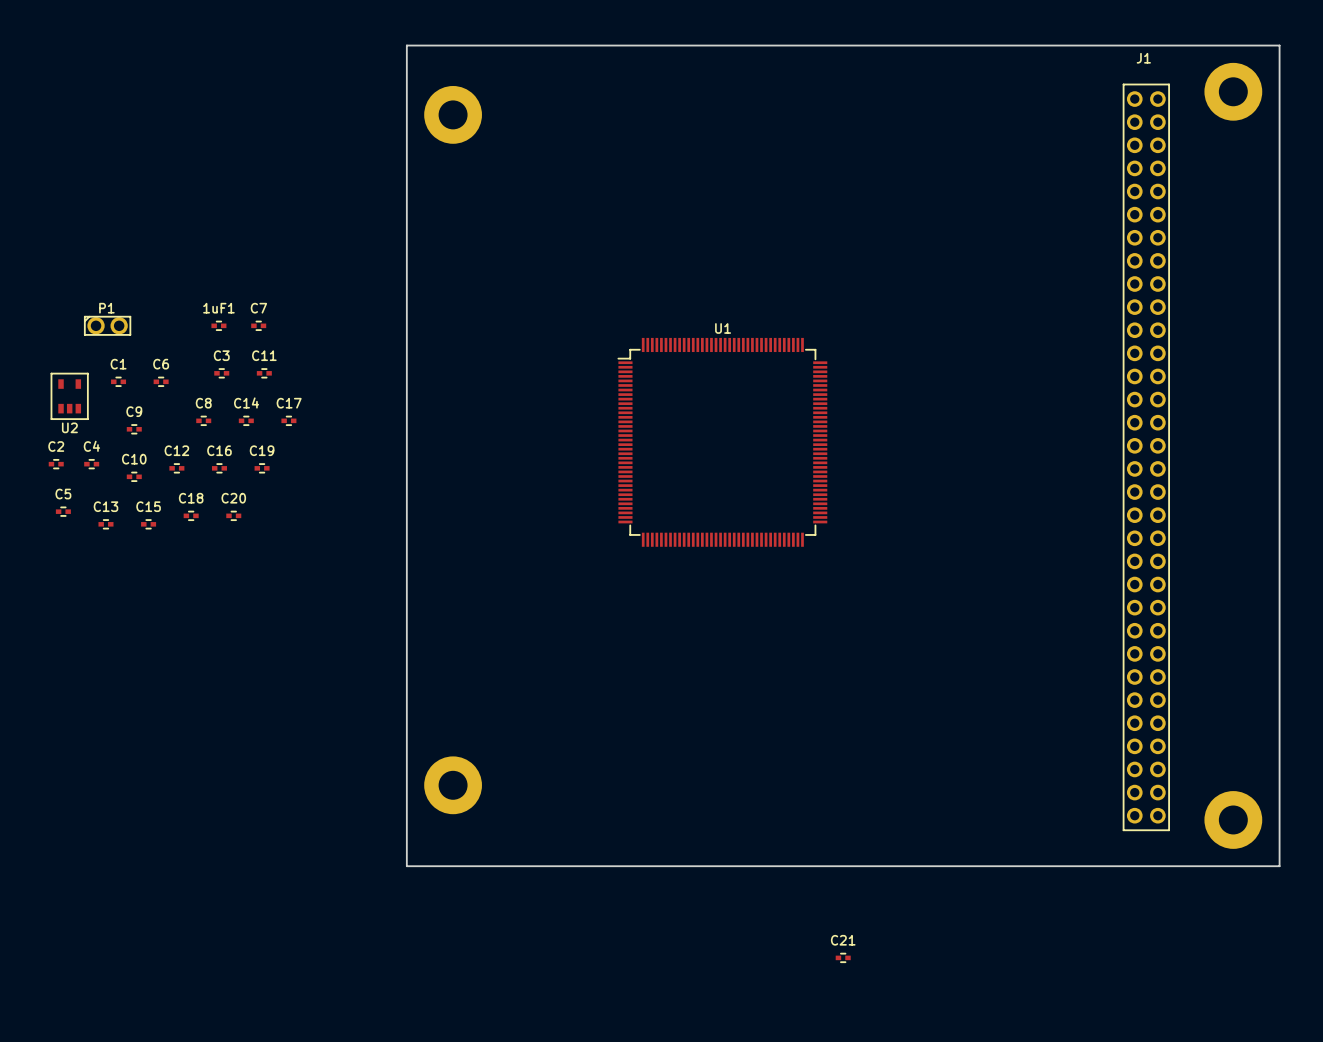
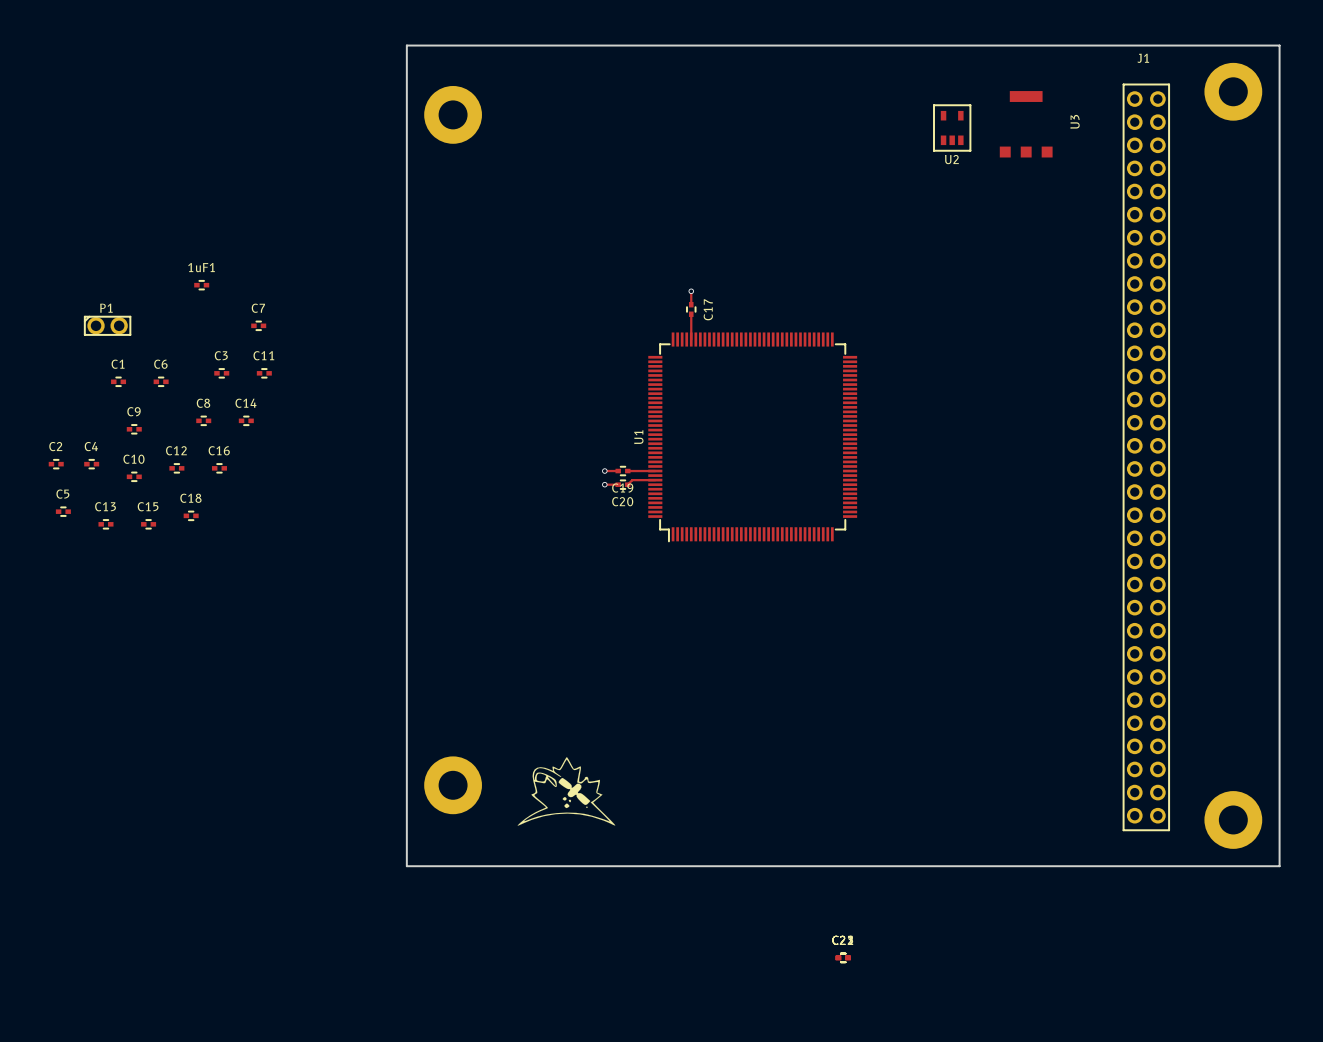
U3: none -> (1026, 124)
track: none -> (691, 291) (691, 304)
via: none -> (691, 291)
track: none -> (691, 314) (691, 339)
1uF1 position: (218, 325) -> (201, 285)
U2 position: (69, 396) -> (952, 128)
C17 rotation: 0° (288, 420) -> 90° clockwise (691, 309)
C17 position: (288, 420) -> (691, 309)
U1 rotation: 0° (722, 442) -> 90° counterclockwise (752, 437)
C19 name position: C19 (262, 450) -> C19 (622, 488)
C19 position: (262, 468) -> (623, 471)
track: none -> (604, 471) (618, 471)
via: none -> (604, 471)
track: none -> (627, 471) (655, 471)
track: none -> (655, 480) (632, 480) (627, 484)
track: none -> (604, 484) (618, 484)
via: none -> (604, 484)
C20 name position: C20 (233, 498) -> C20 (622, 501)
C20 position: (233, 515) -> (623, 484)
drawing: none -> [517, 757, 616, 826]
part: none -> (843, 957)
part: none -> (843, 957)

